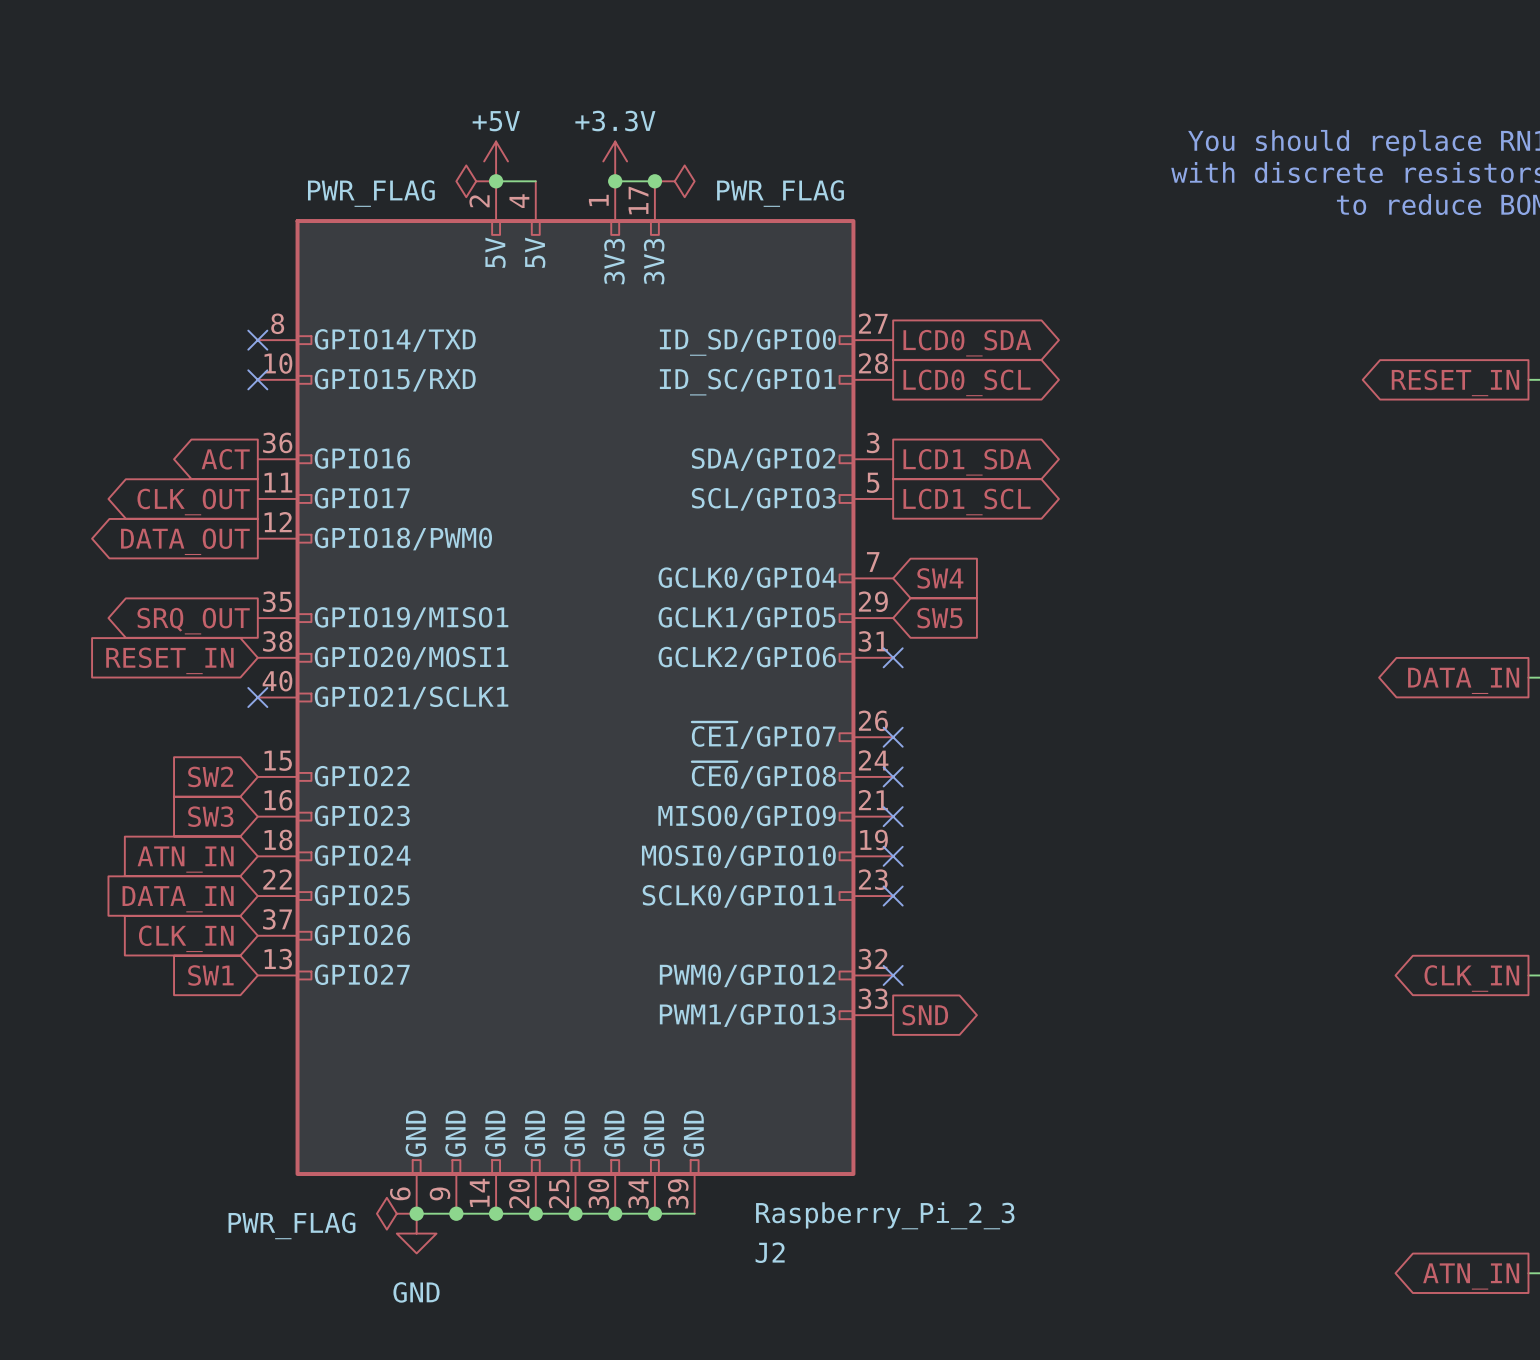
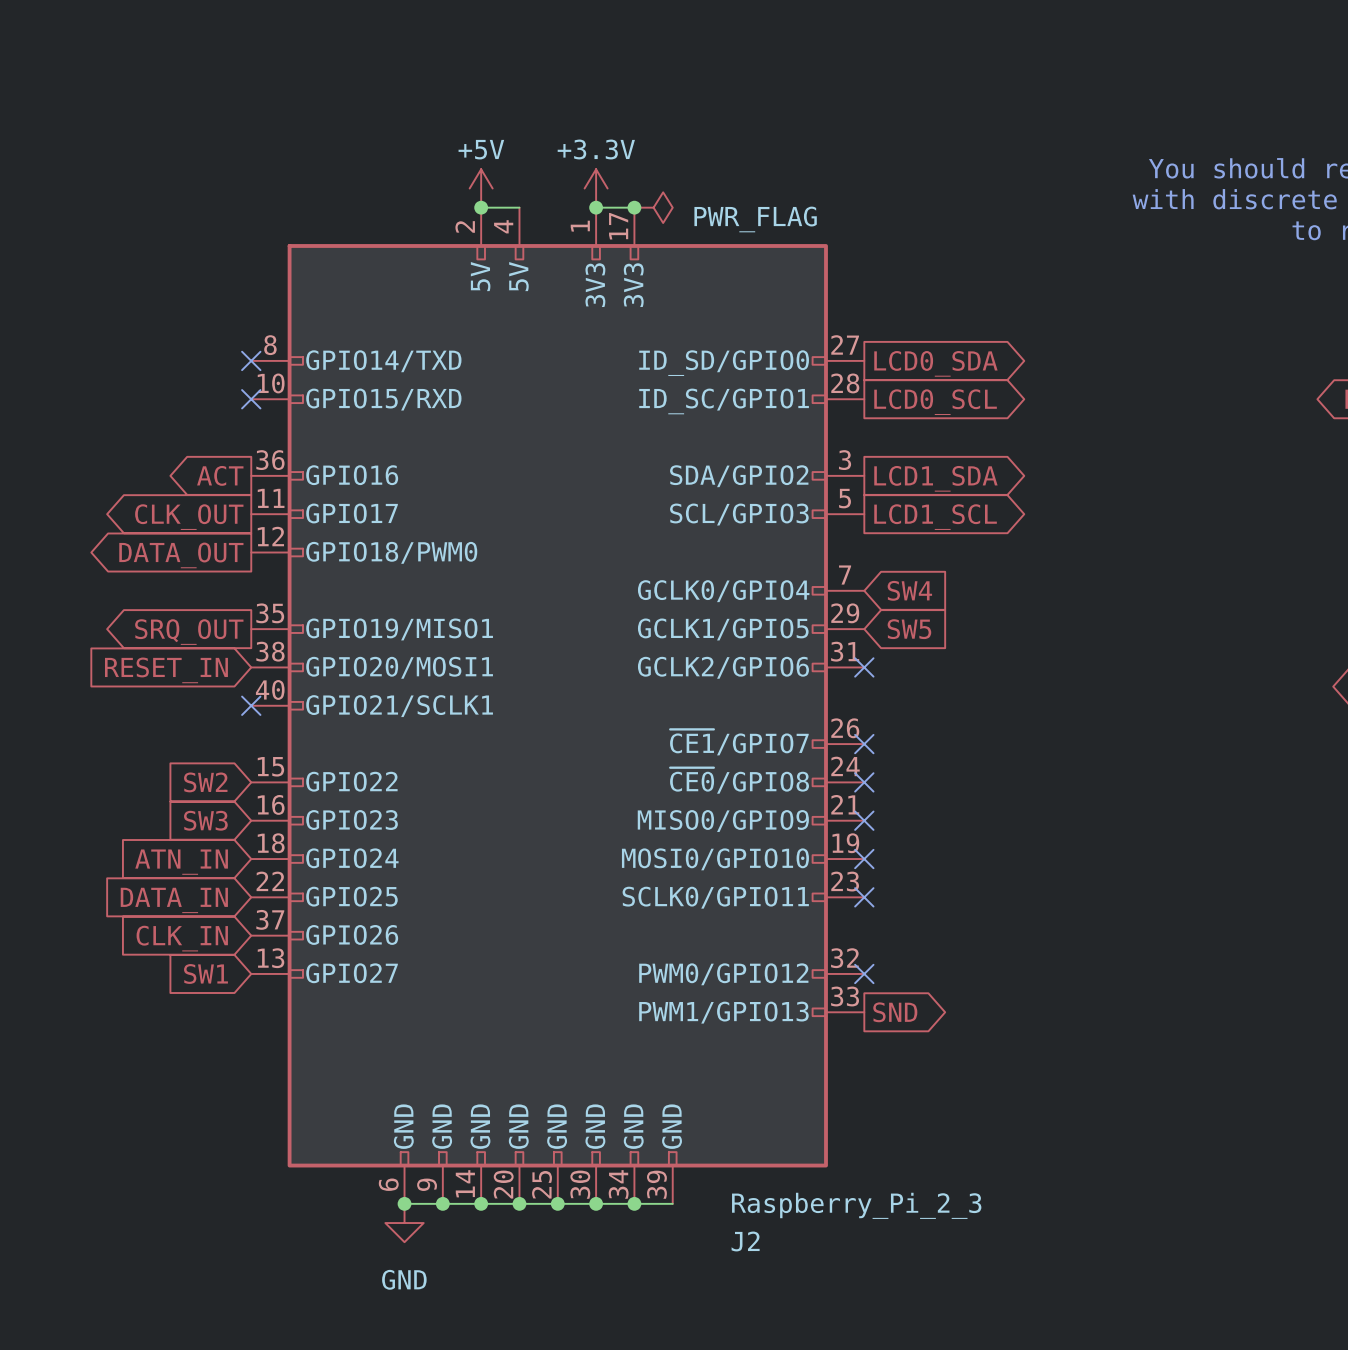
power symbol: PWR_FLAG (476, 181) -> none
power symbol: PWR_FLAG (396, 1213) -> none

